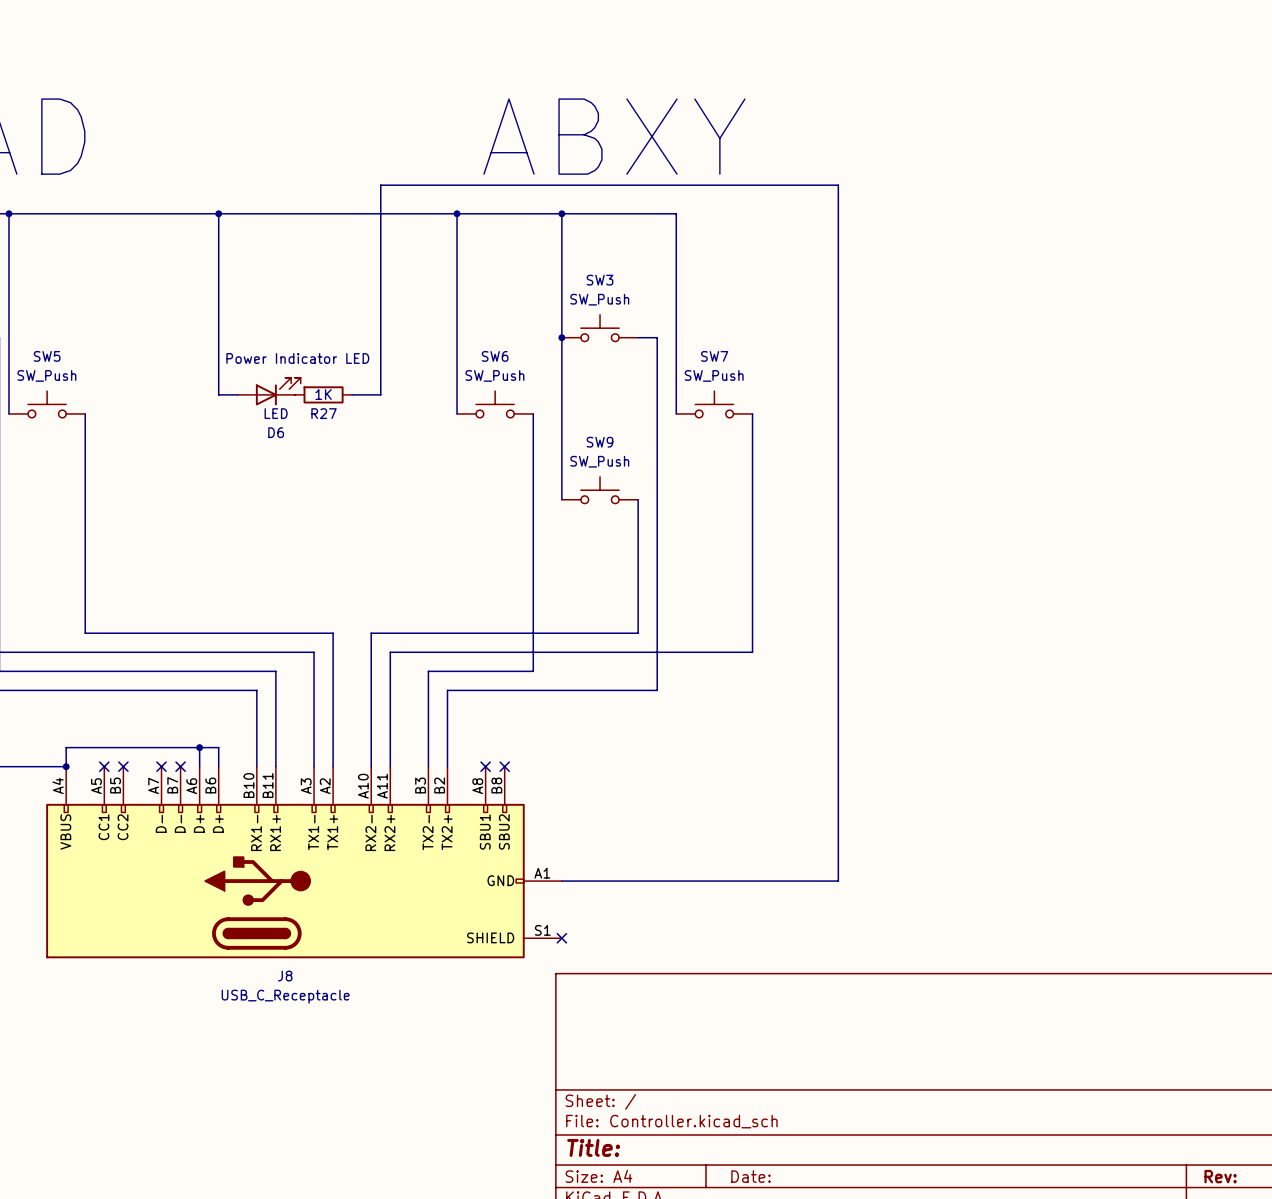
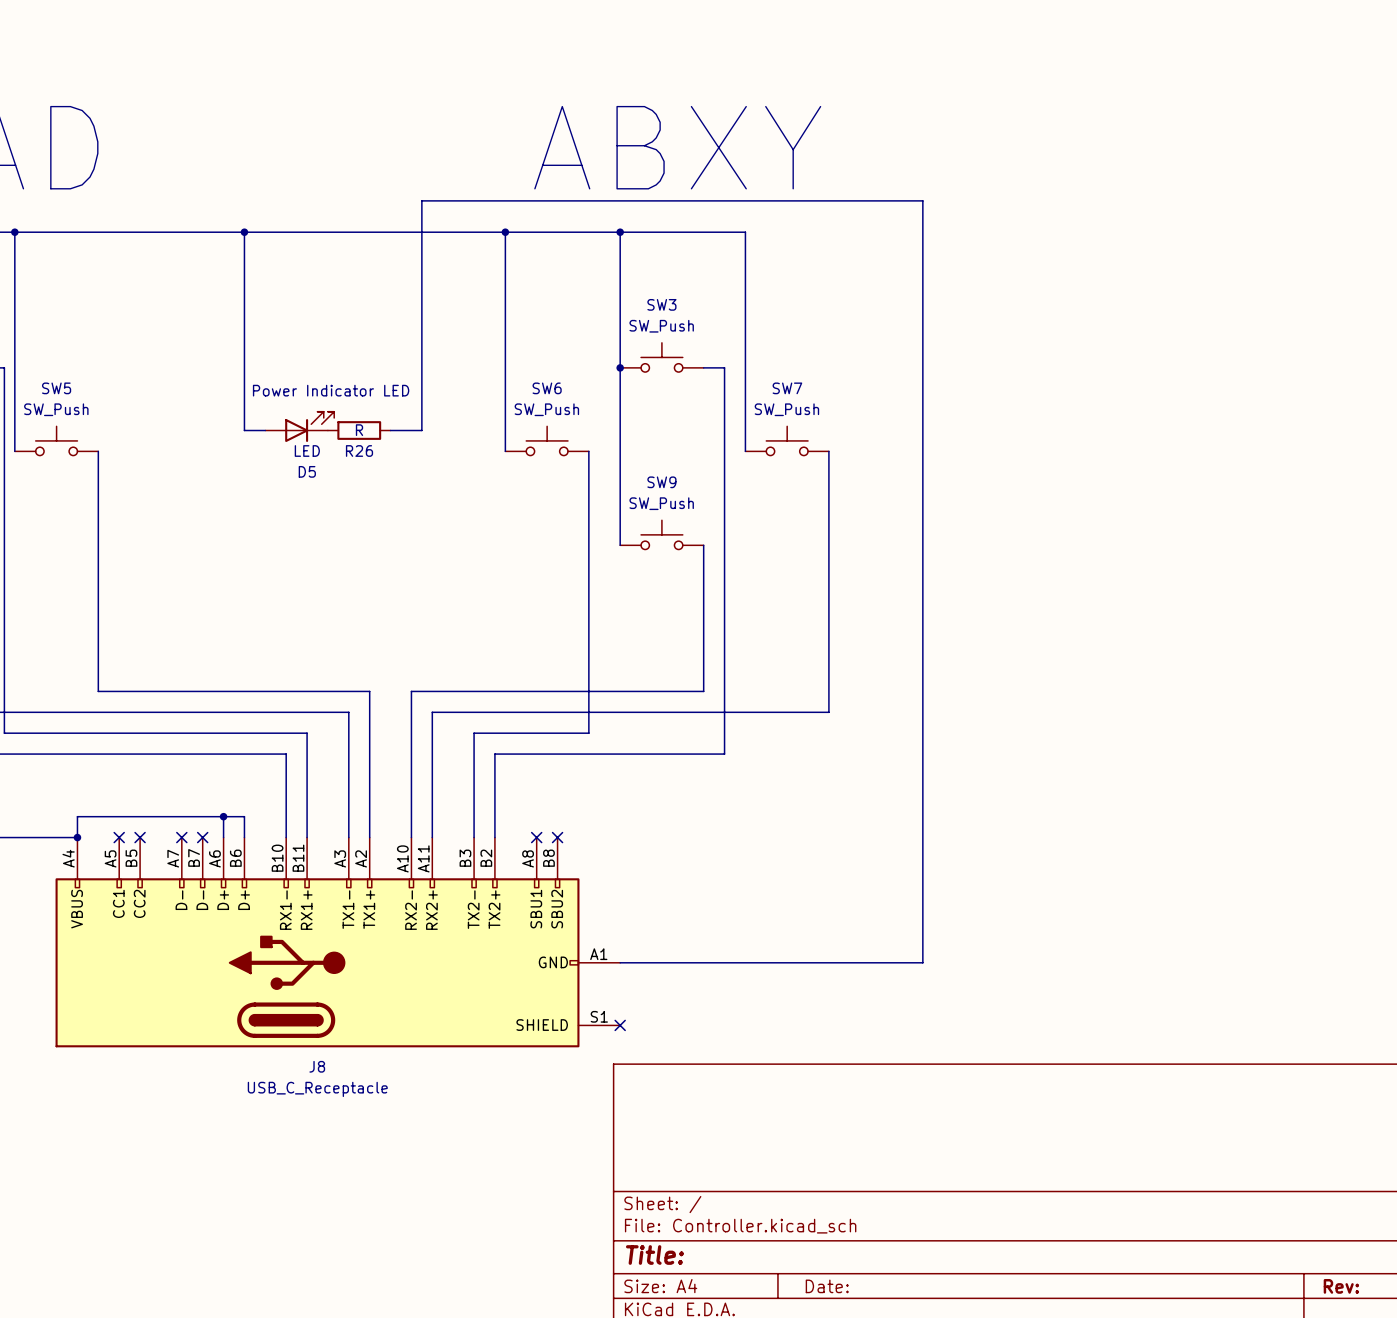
R27 value: 1K (323, 394) -> R (359, 430)
R27 name: R27 (324, 413) -> R26 (359, 450)
D6 name: D6 (276, 432) -> D5 (307, 471)

